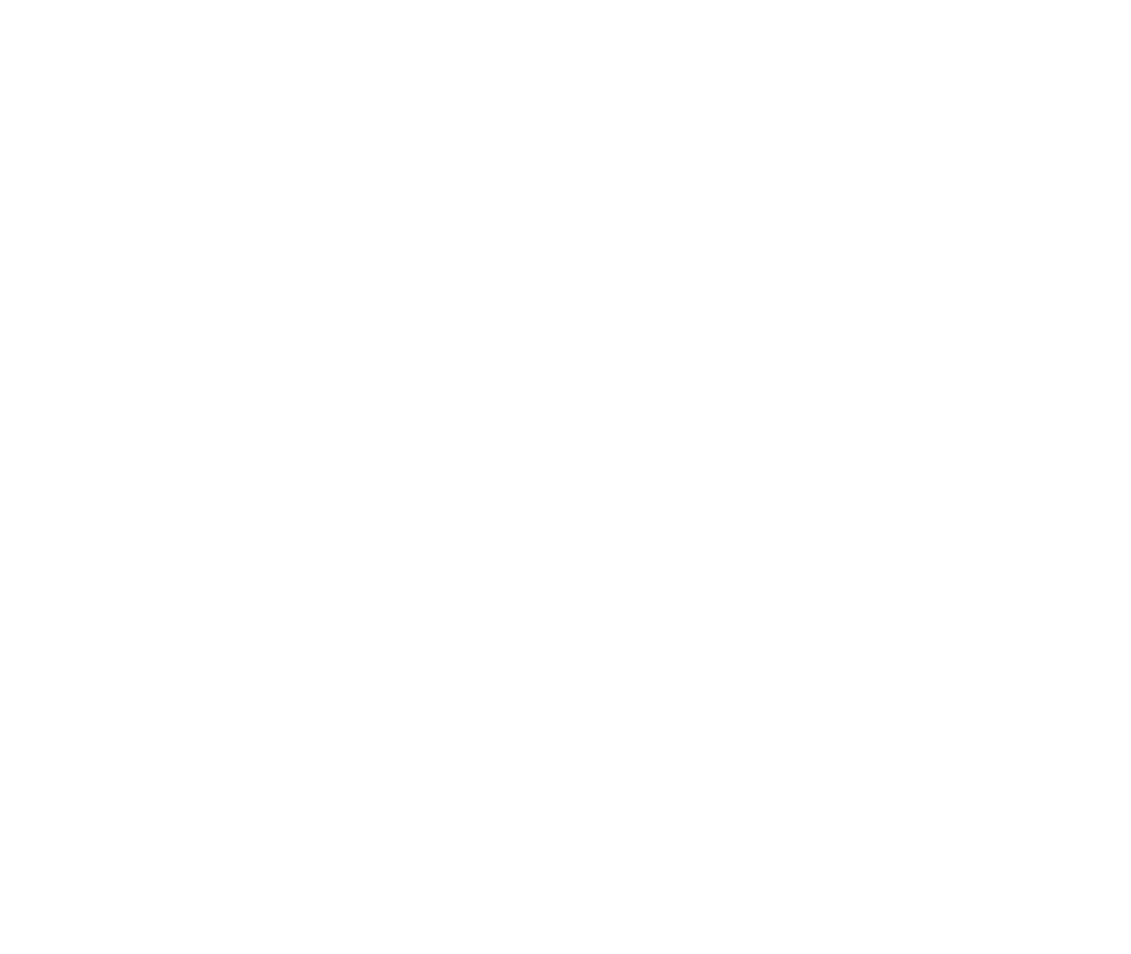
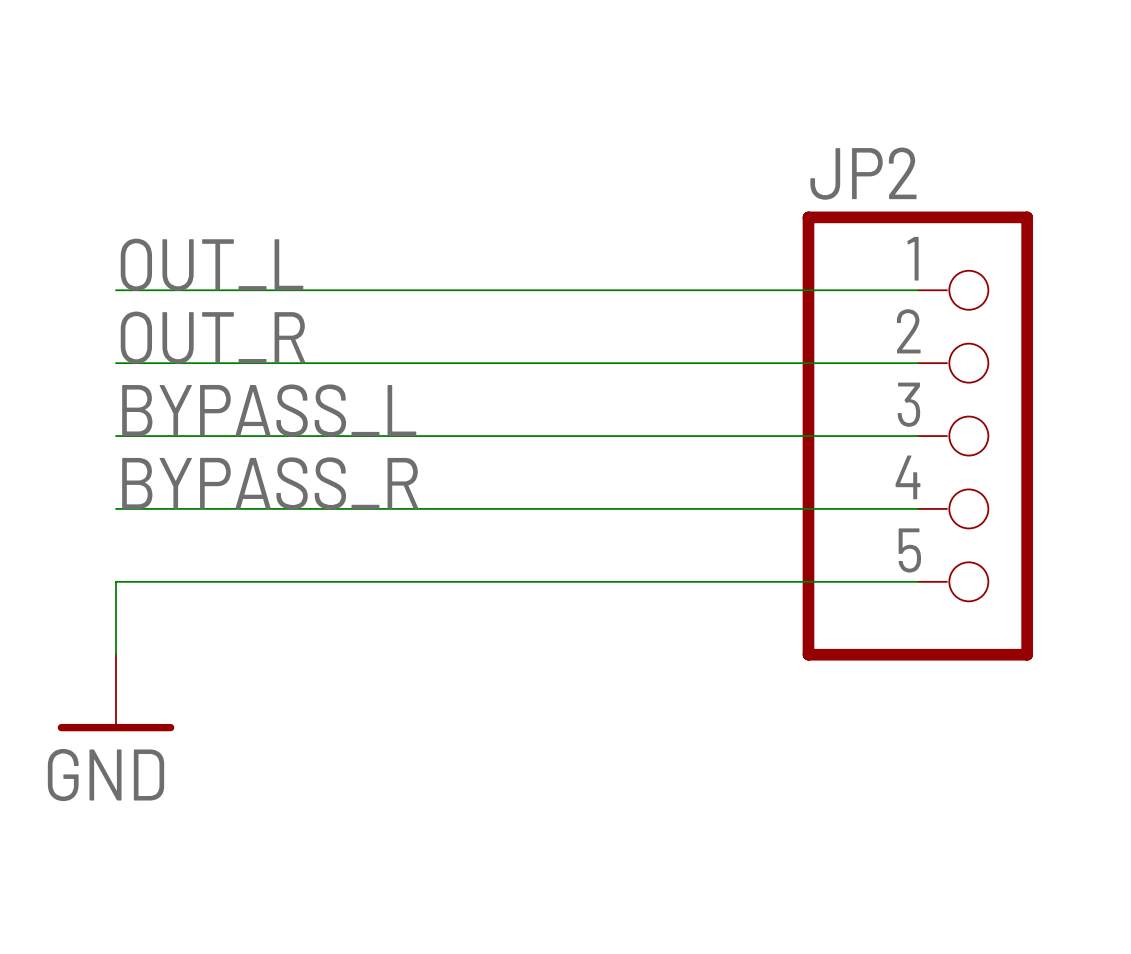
label: none -> OUT_L (212, 264)
wire: none -> (116, 290) (917, 290)
label: none -> OUT_R (213, 337)
wire: none -> (116, 363) (917, 363)
label: none -> BYPASS_L (269, 410)
wire: none -> (116, 436) (917, 436)
JP2: none -> (917, 436)
label: none -> BYPASS_R (270, 483)
wire: none -> (116, 508) (917, 508)
wire: none -> (917, 581) (116, 581) (116, 654)
power symbol: none -> GND (116, 692)

